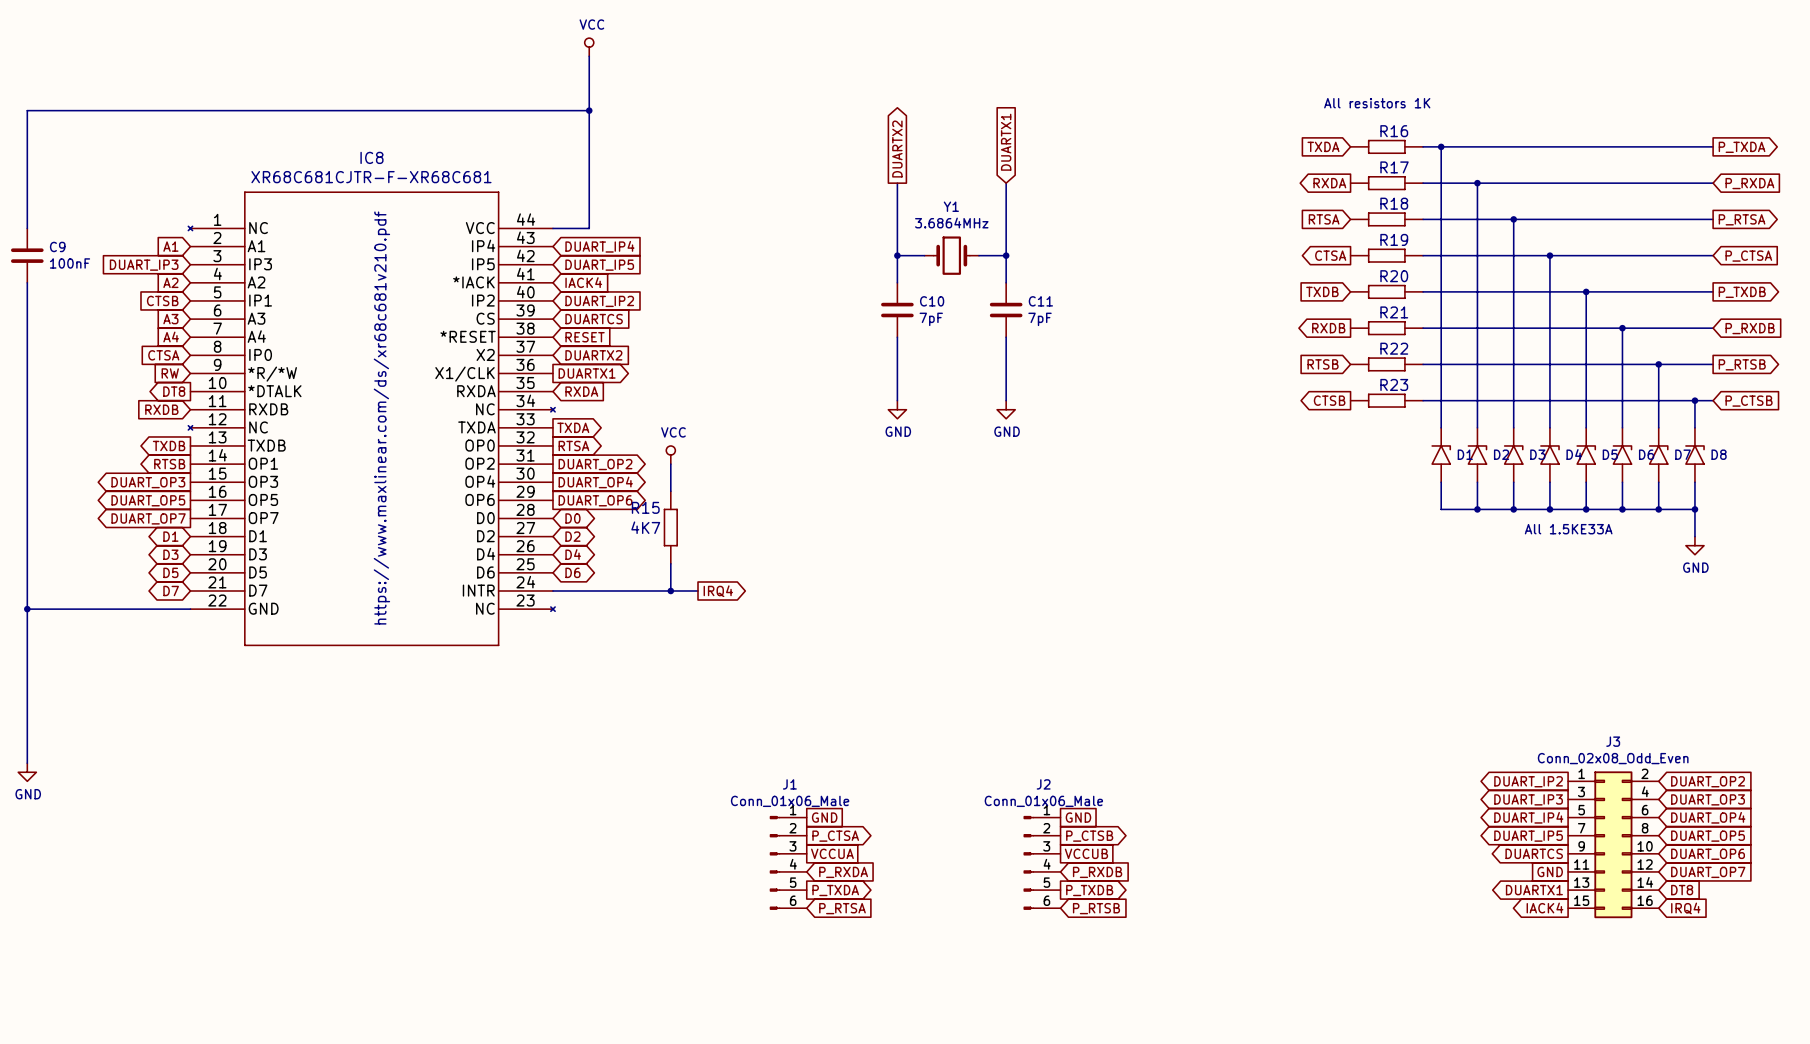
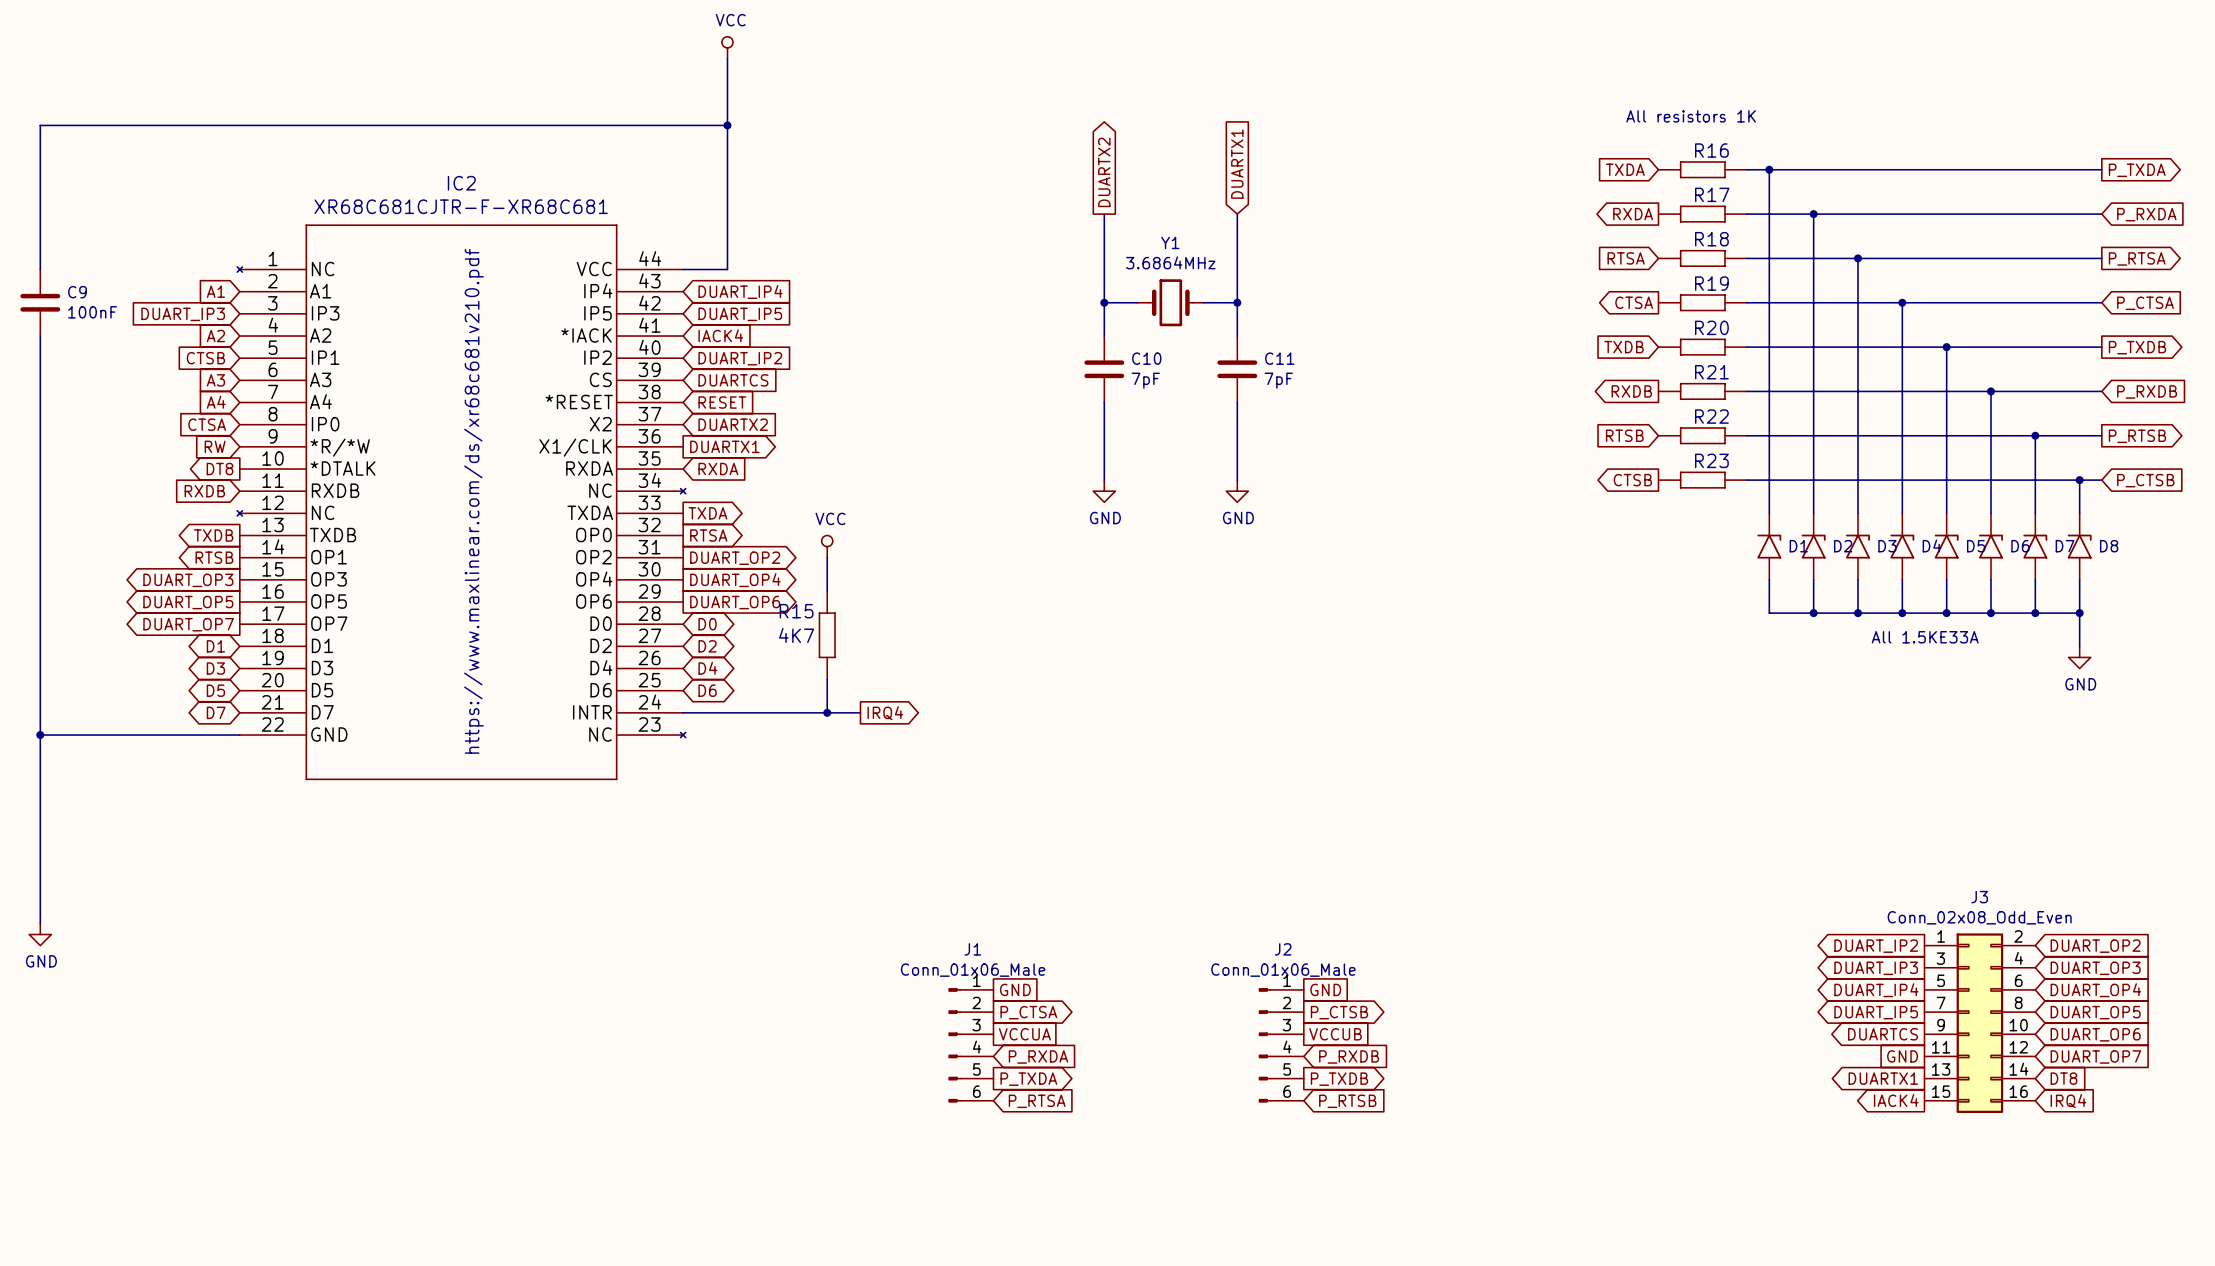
IC8 name: IC8 (371, 157) -> IC2 (461, 183)

